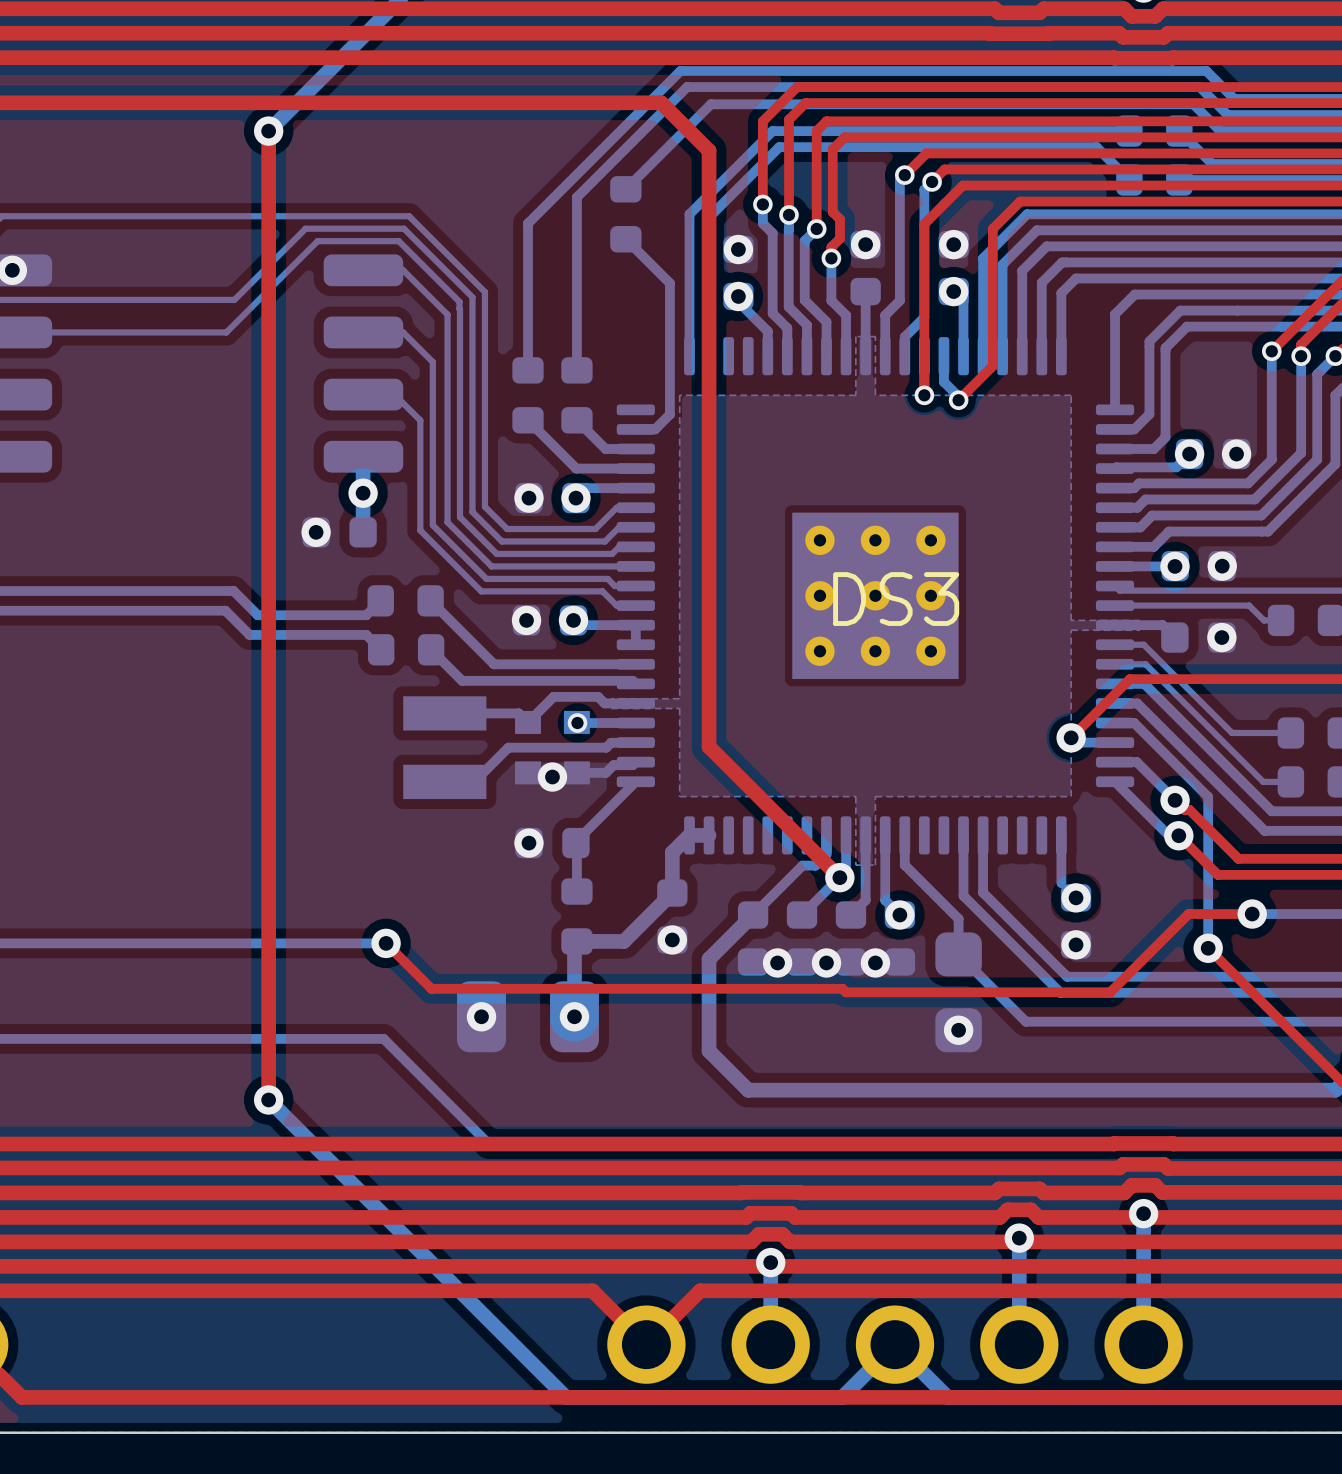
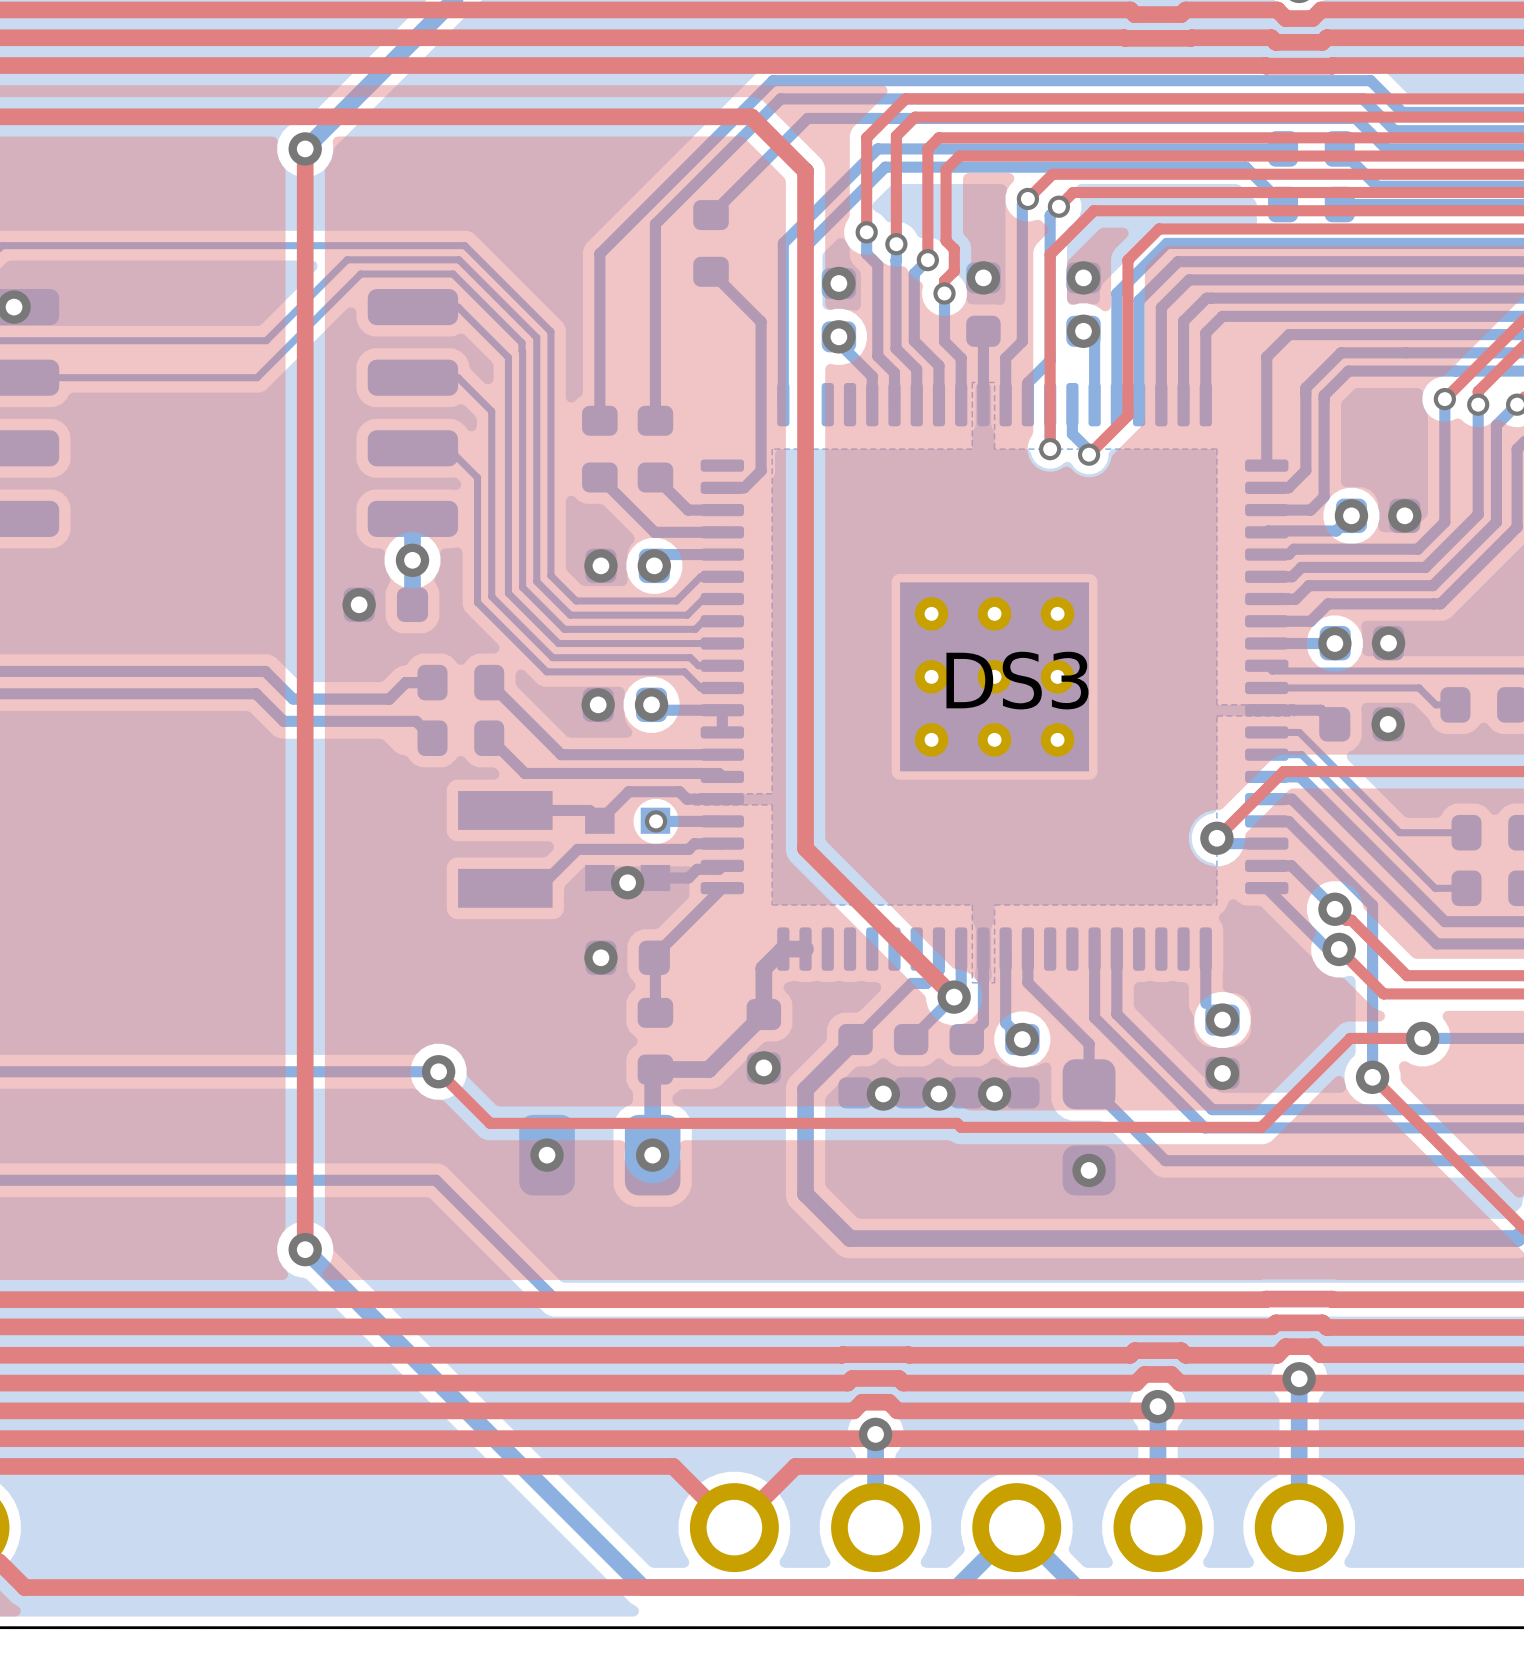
bottom track: (380, 600) (366, 615) (257, 615) -> (432, 682) (405, 682) (389, 699) (293, 699)

